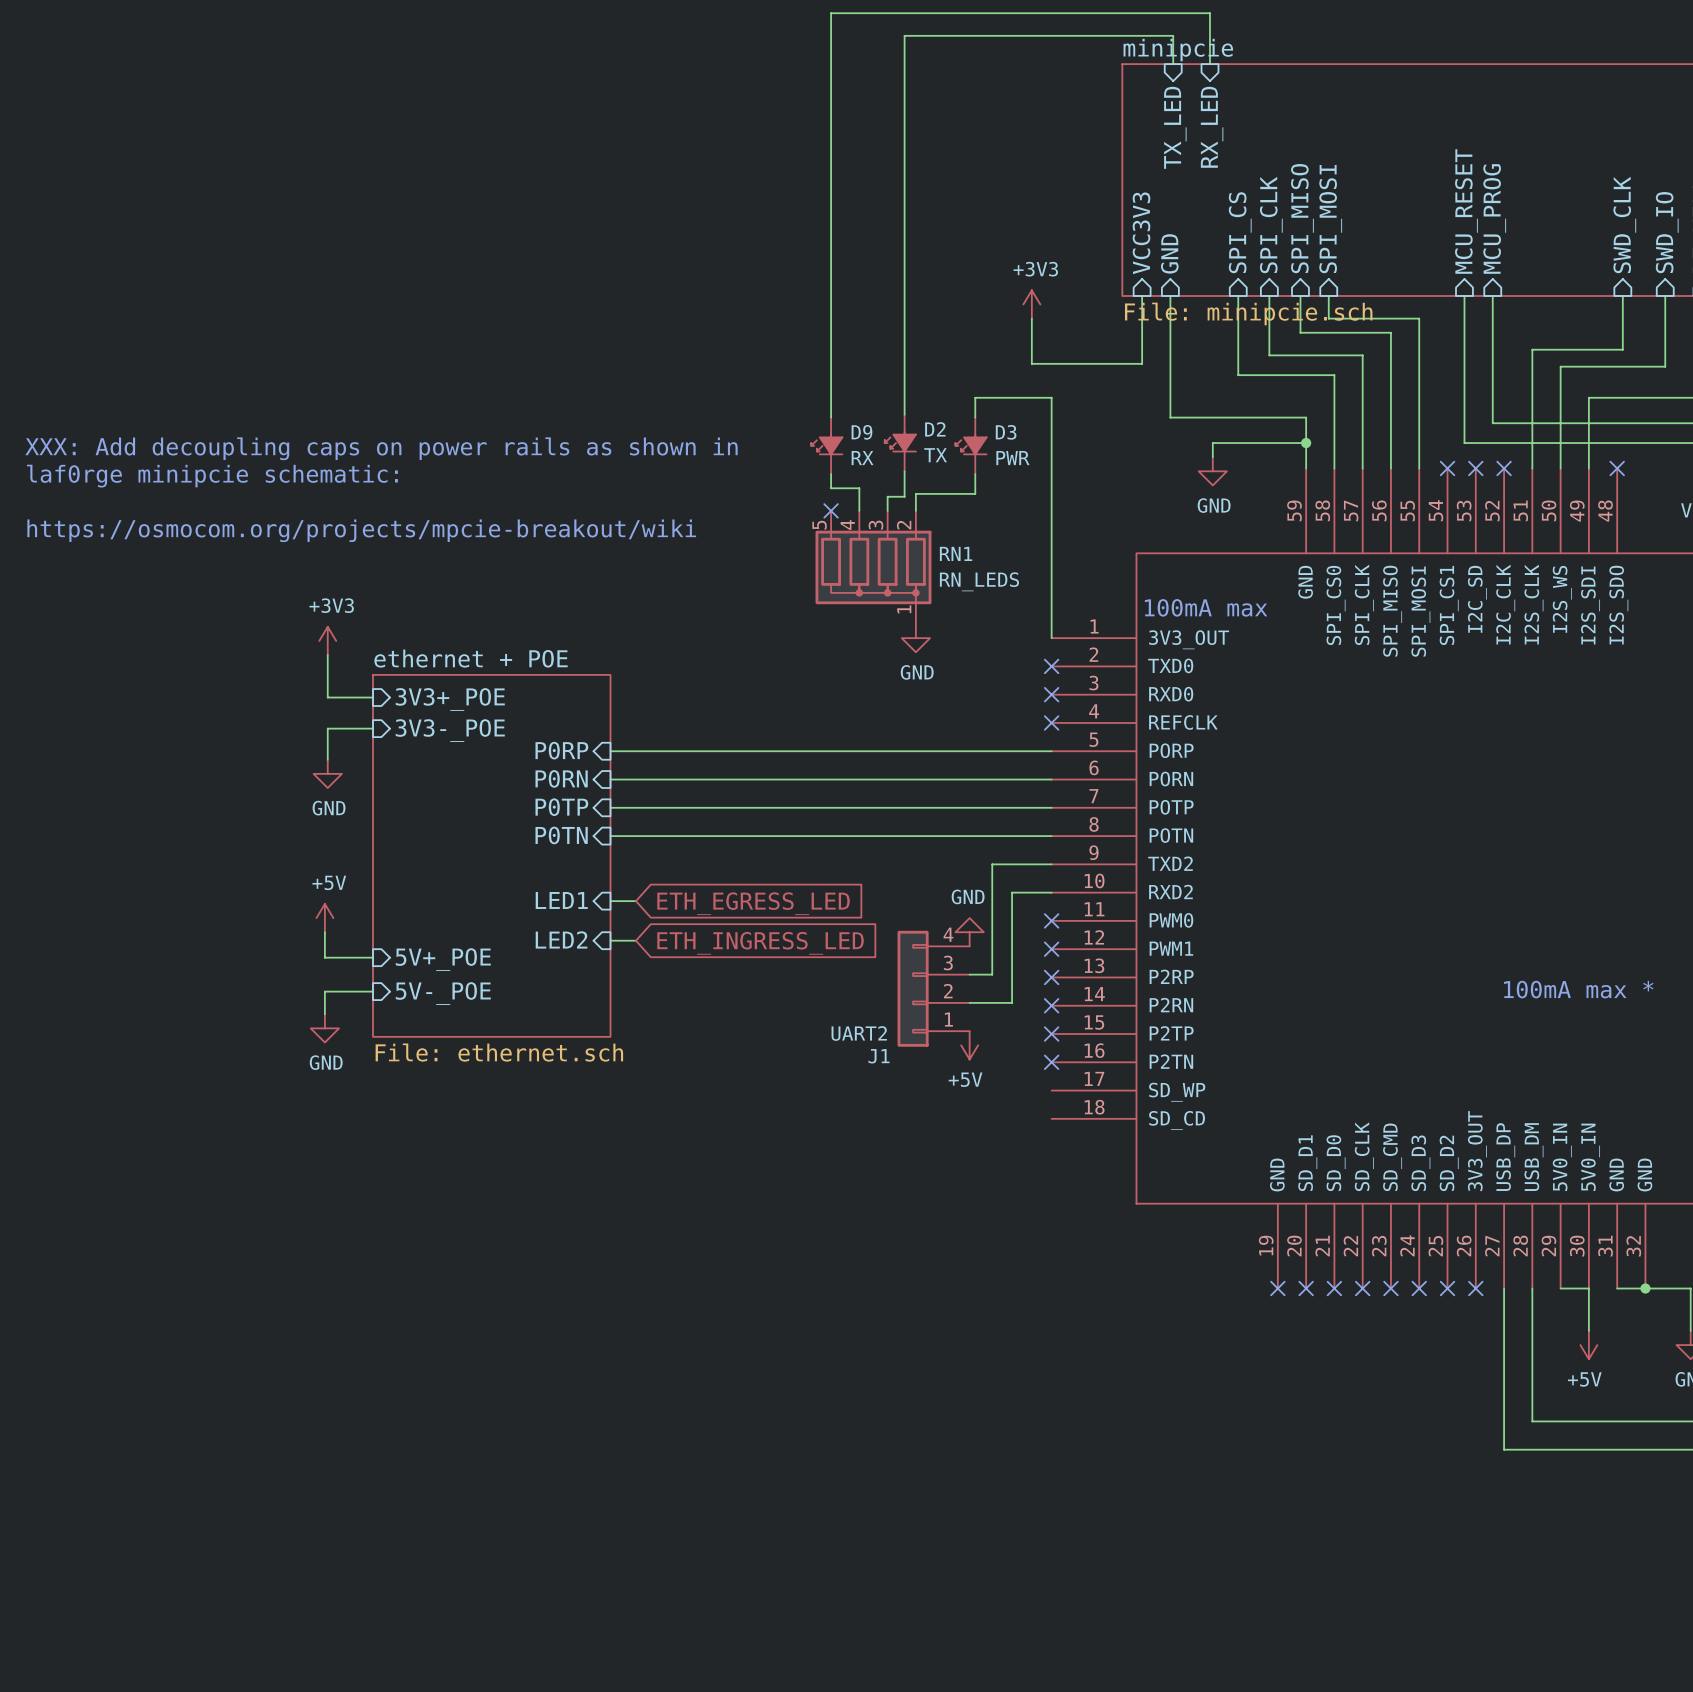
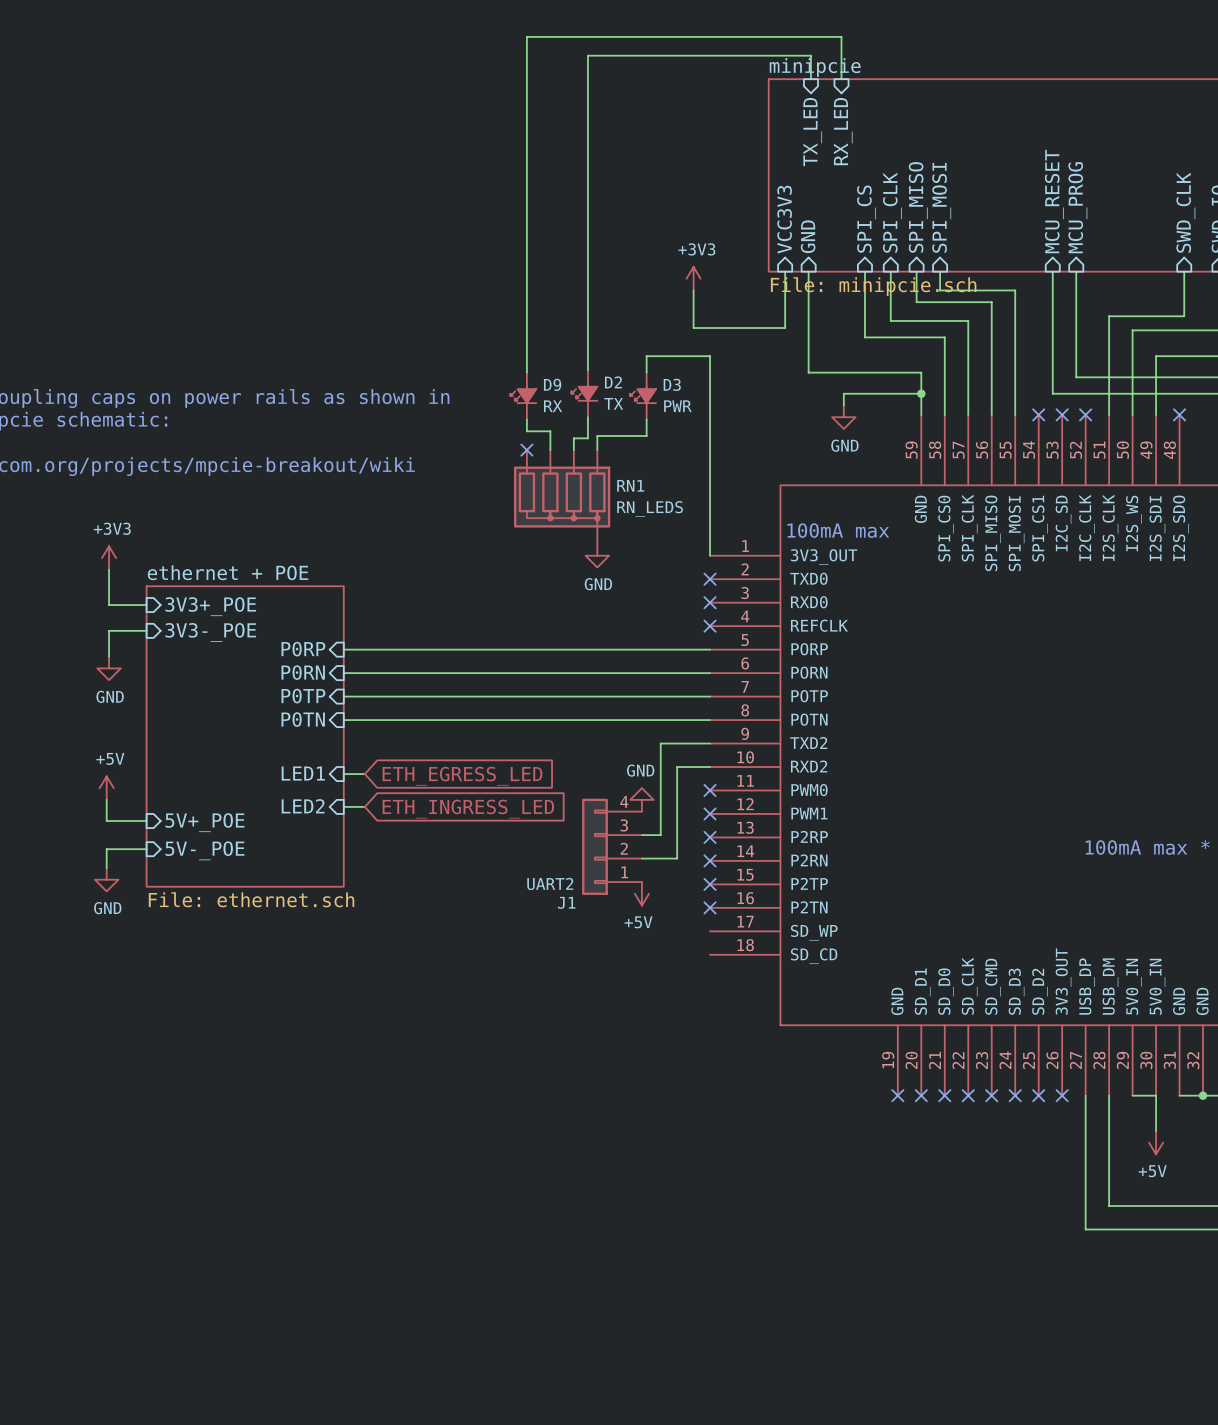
RN1 pin number: 5 (819, 525) -> none
RN1 pin number: 4 (847, 525) -> none
RN1 pin number: 3 (875, 525) -> none
RN1 pin number: 2 (904, 525) -> none
RN1 pin number: 1 (904, 609) -> none

